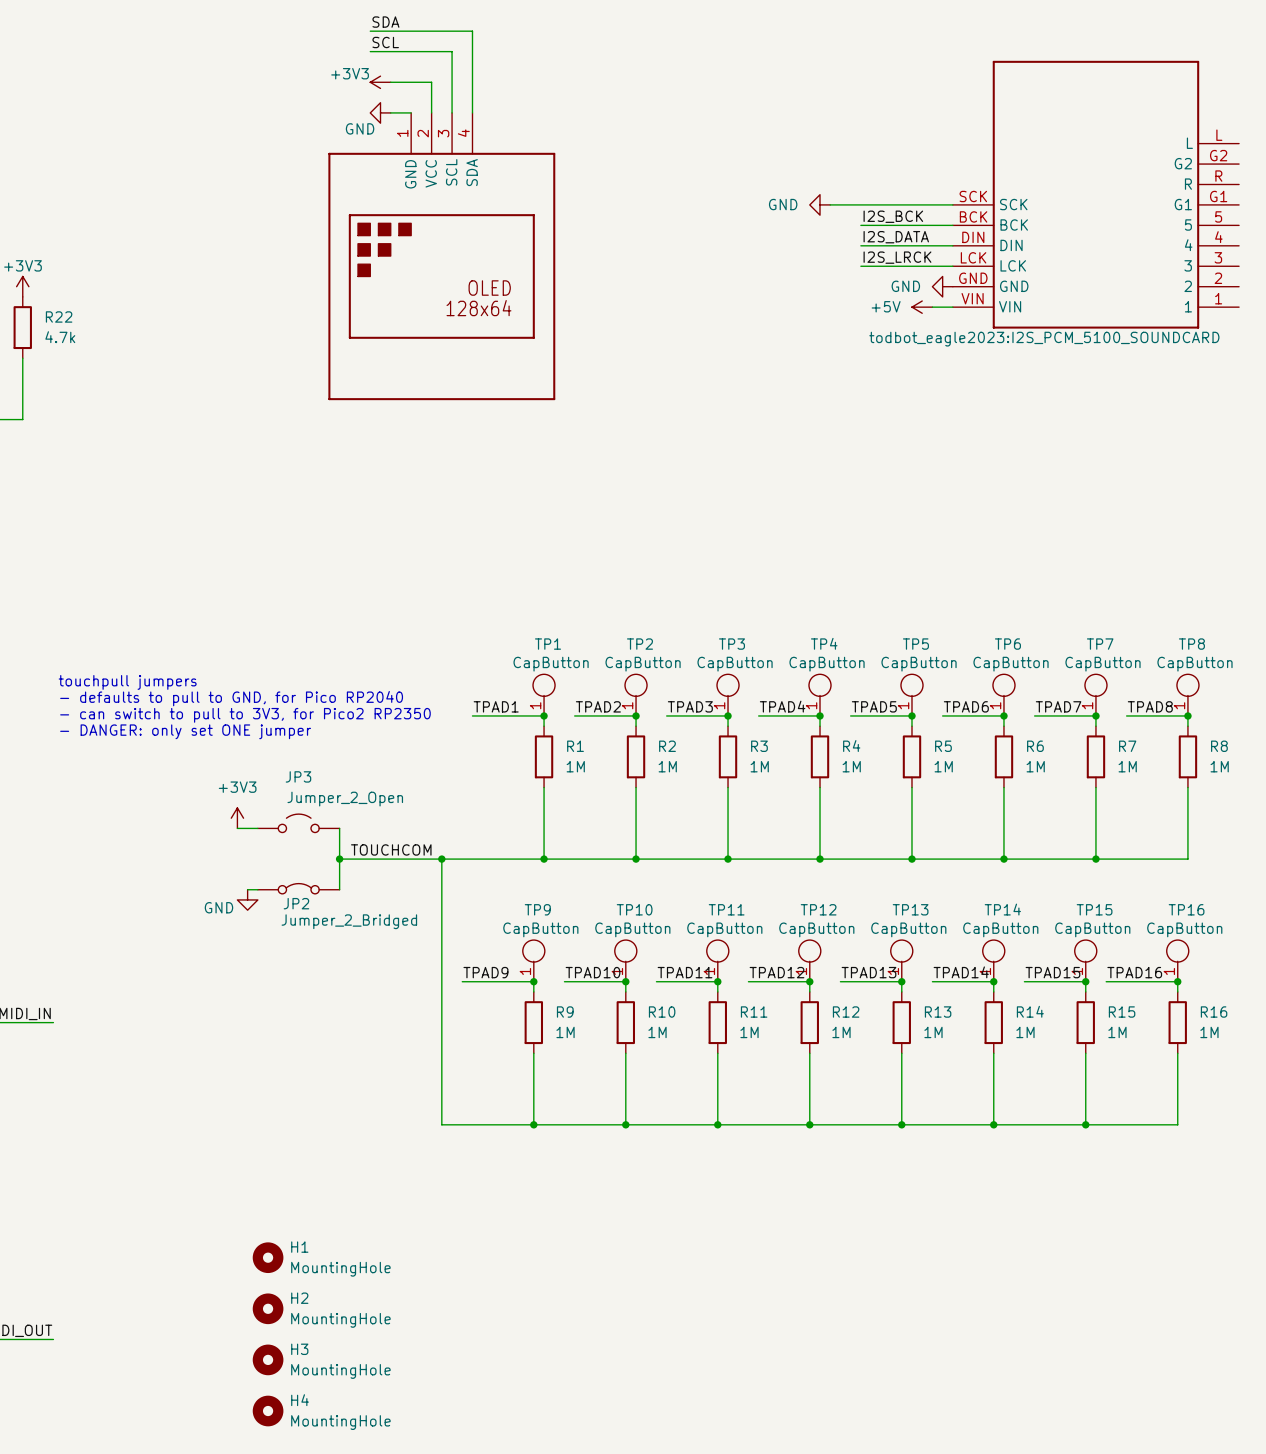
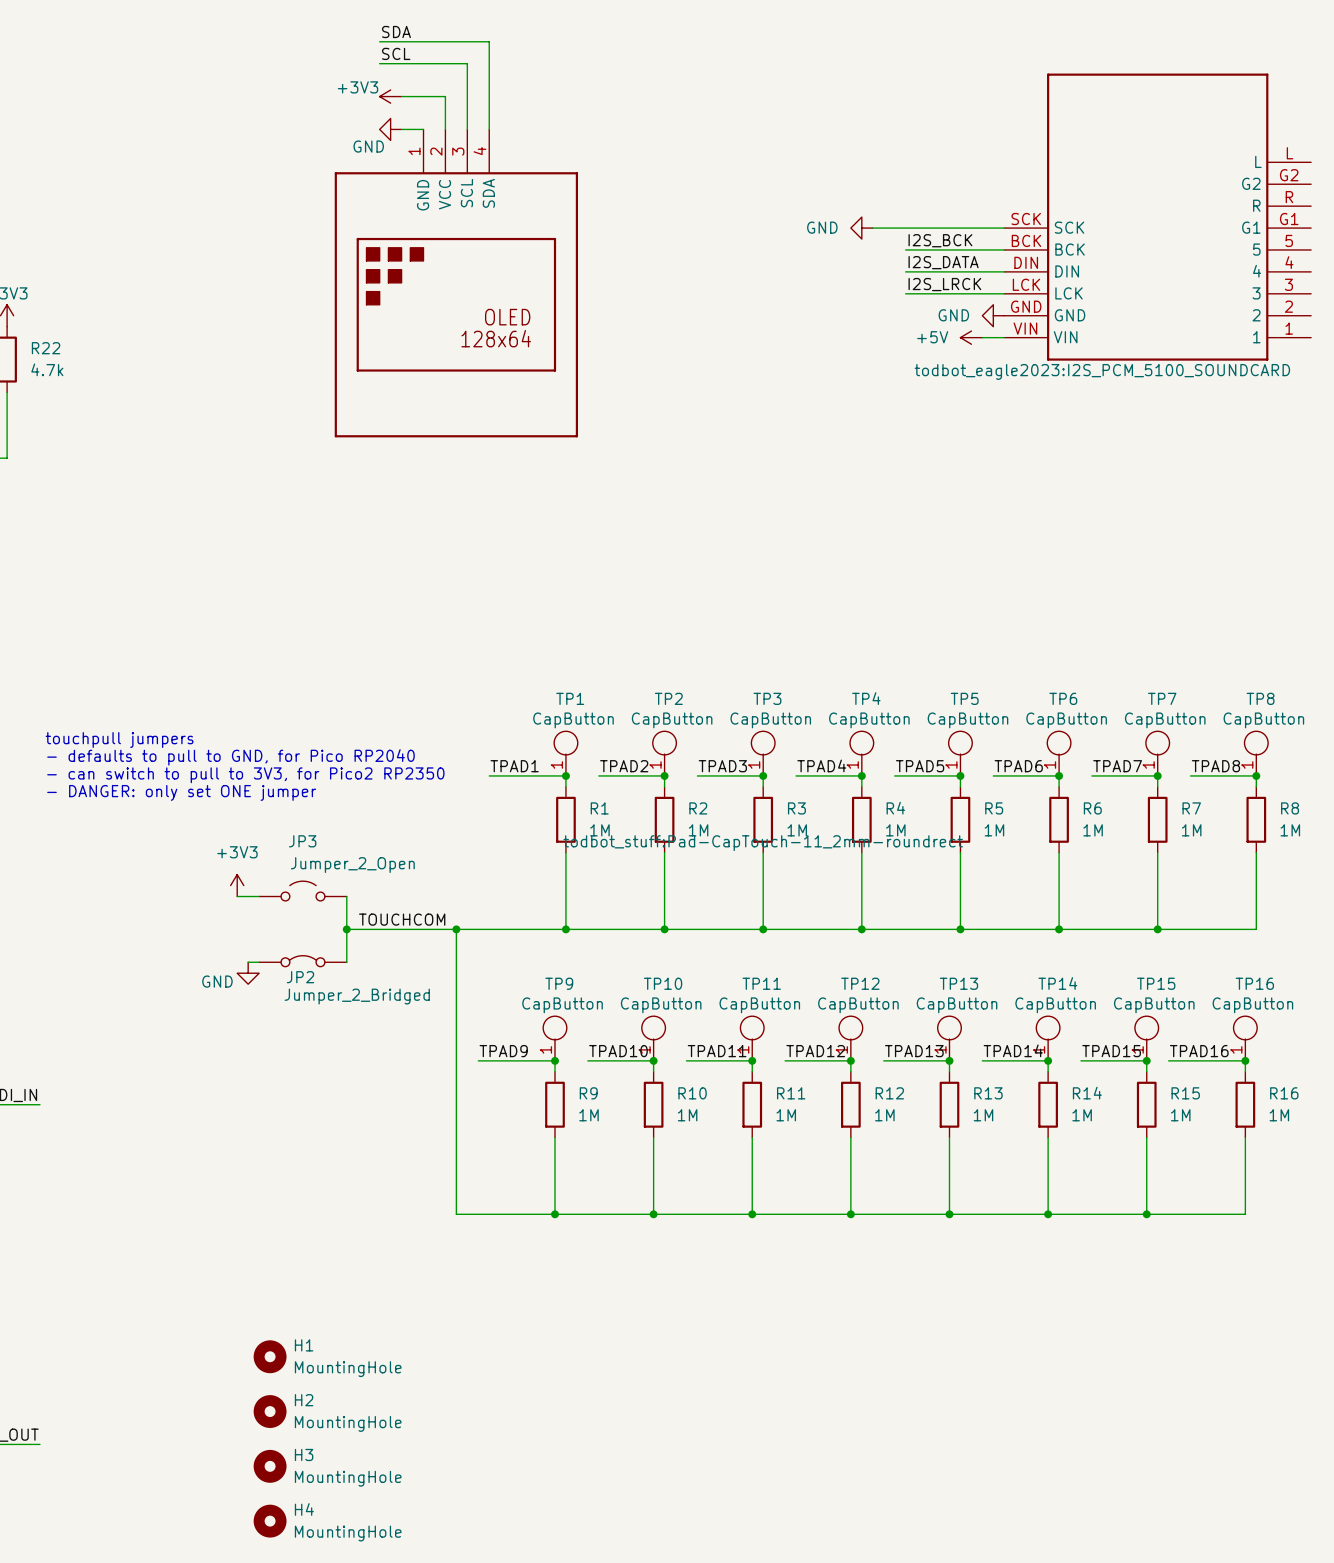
TP3 text: none -> todbot_stuff:Pad-CapTouch-11_2mm-roundrect (763, 843)

